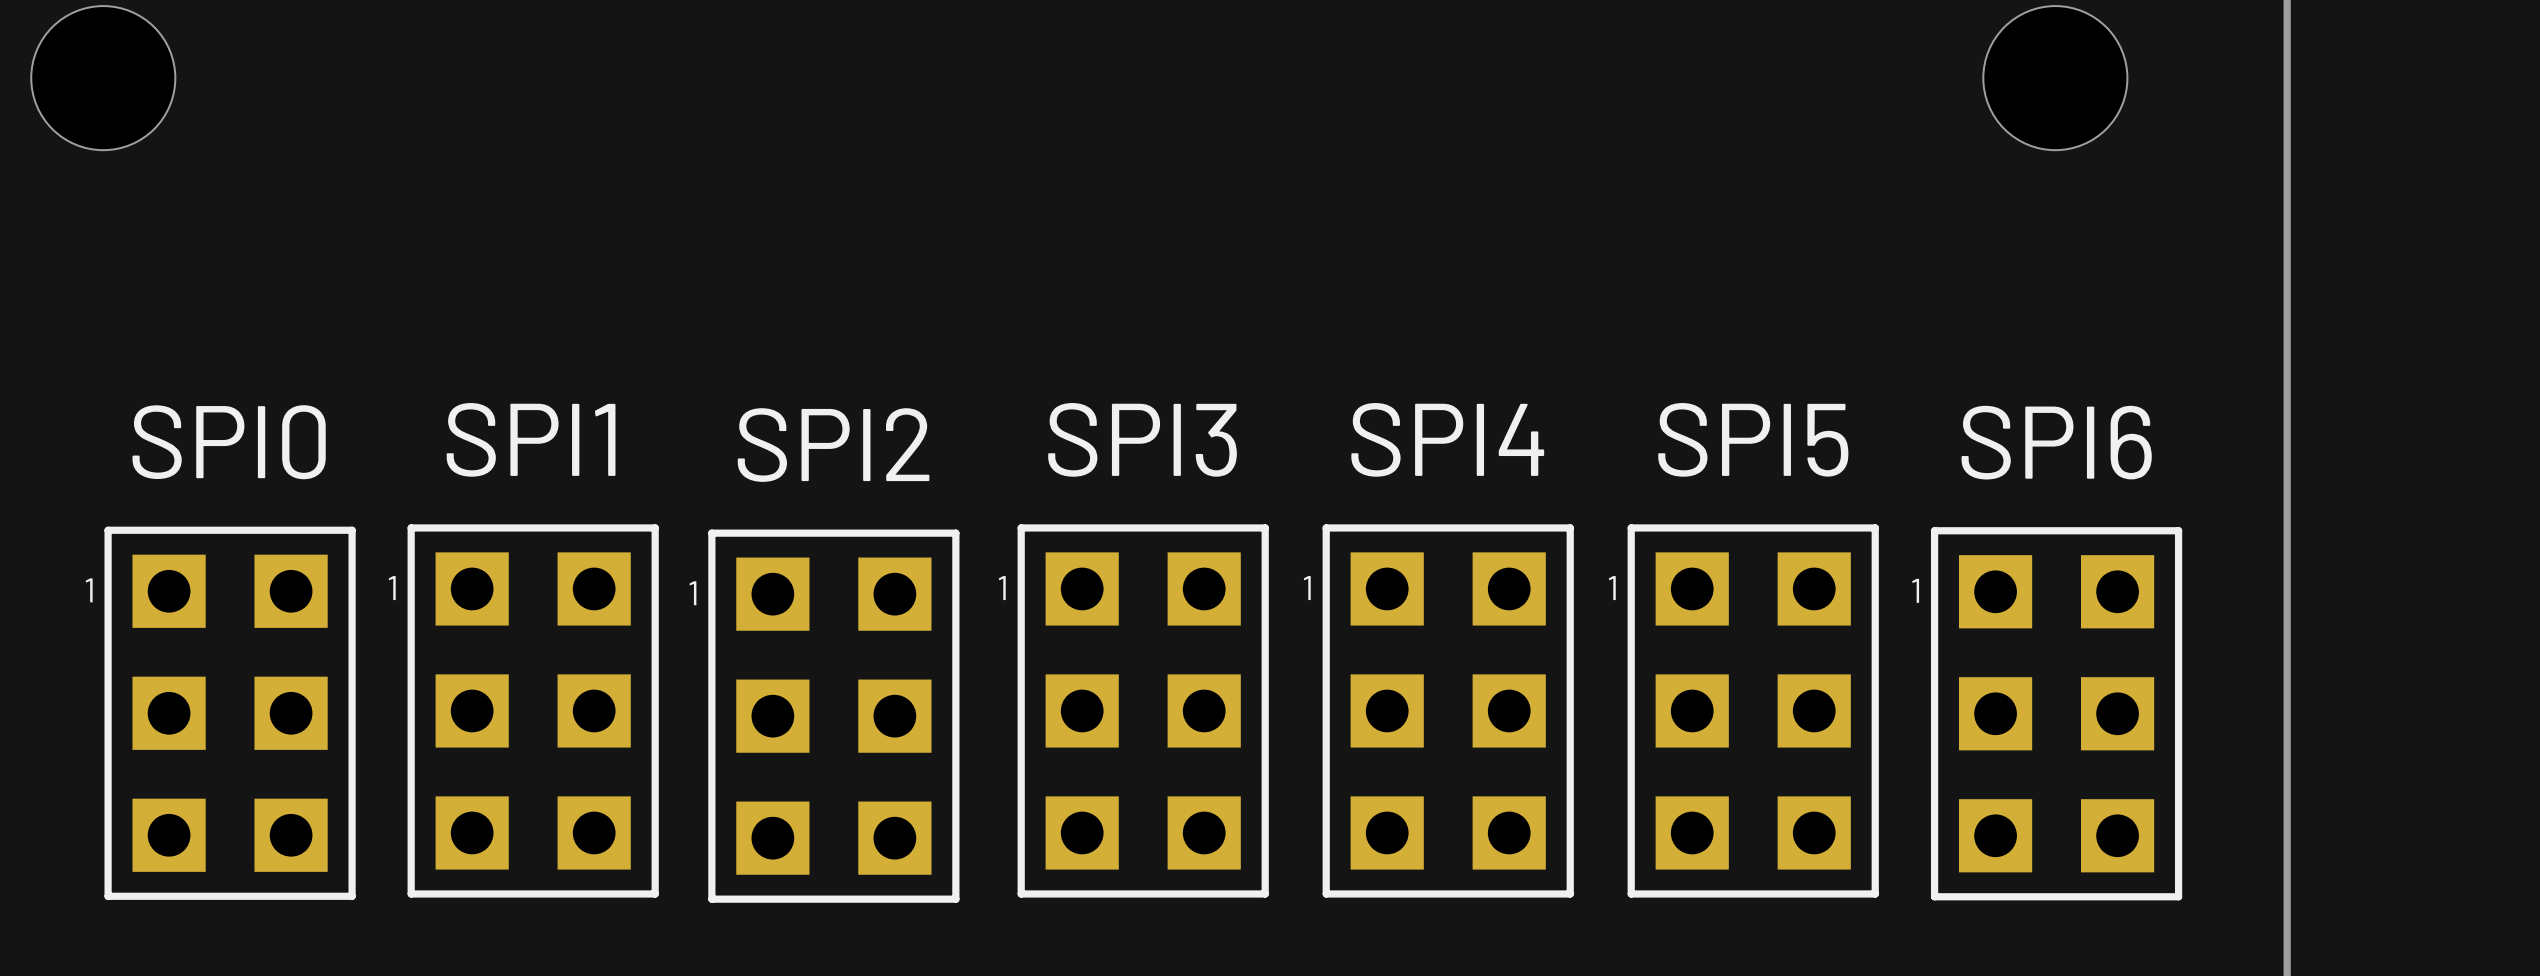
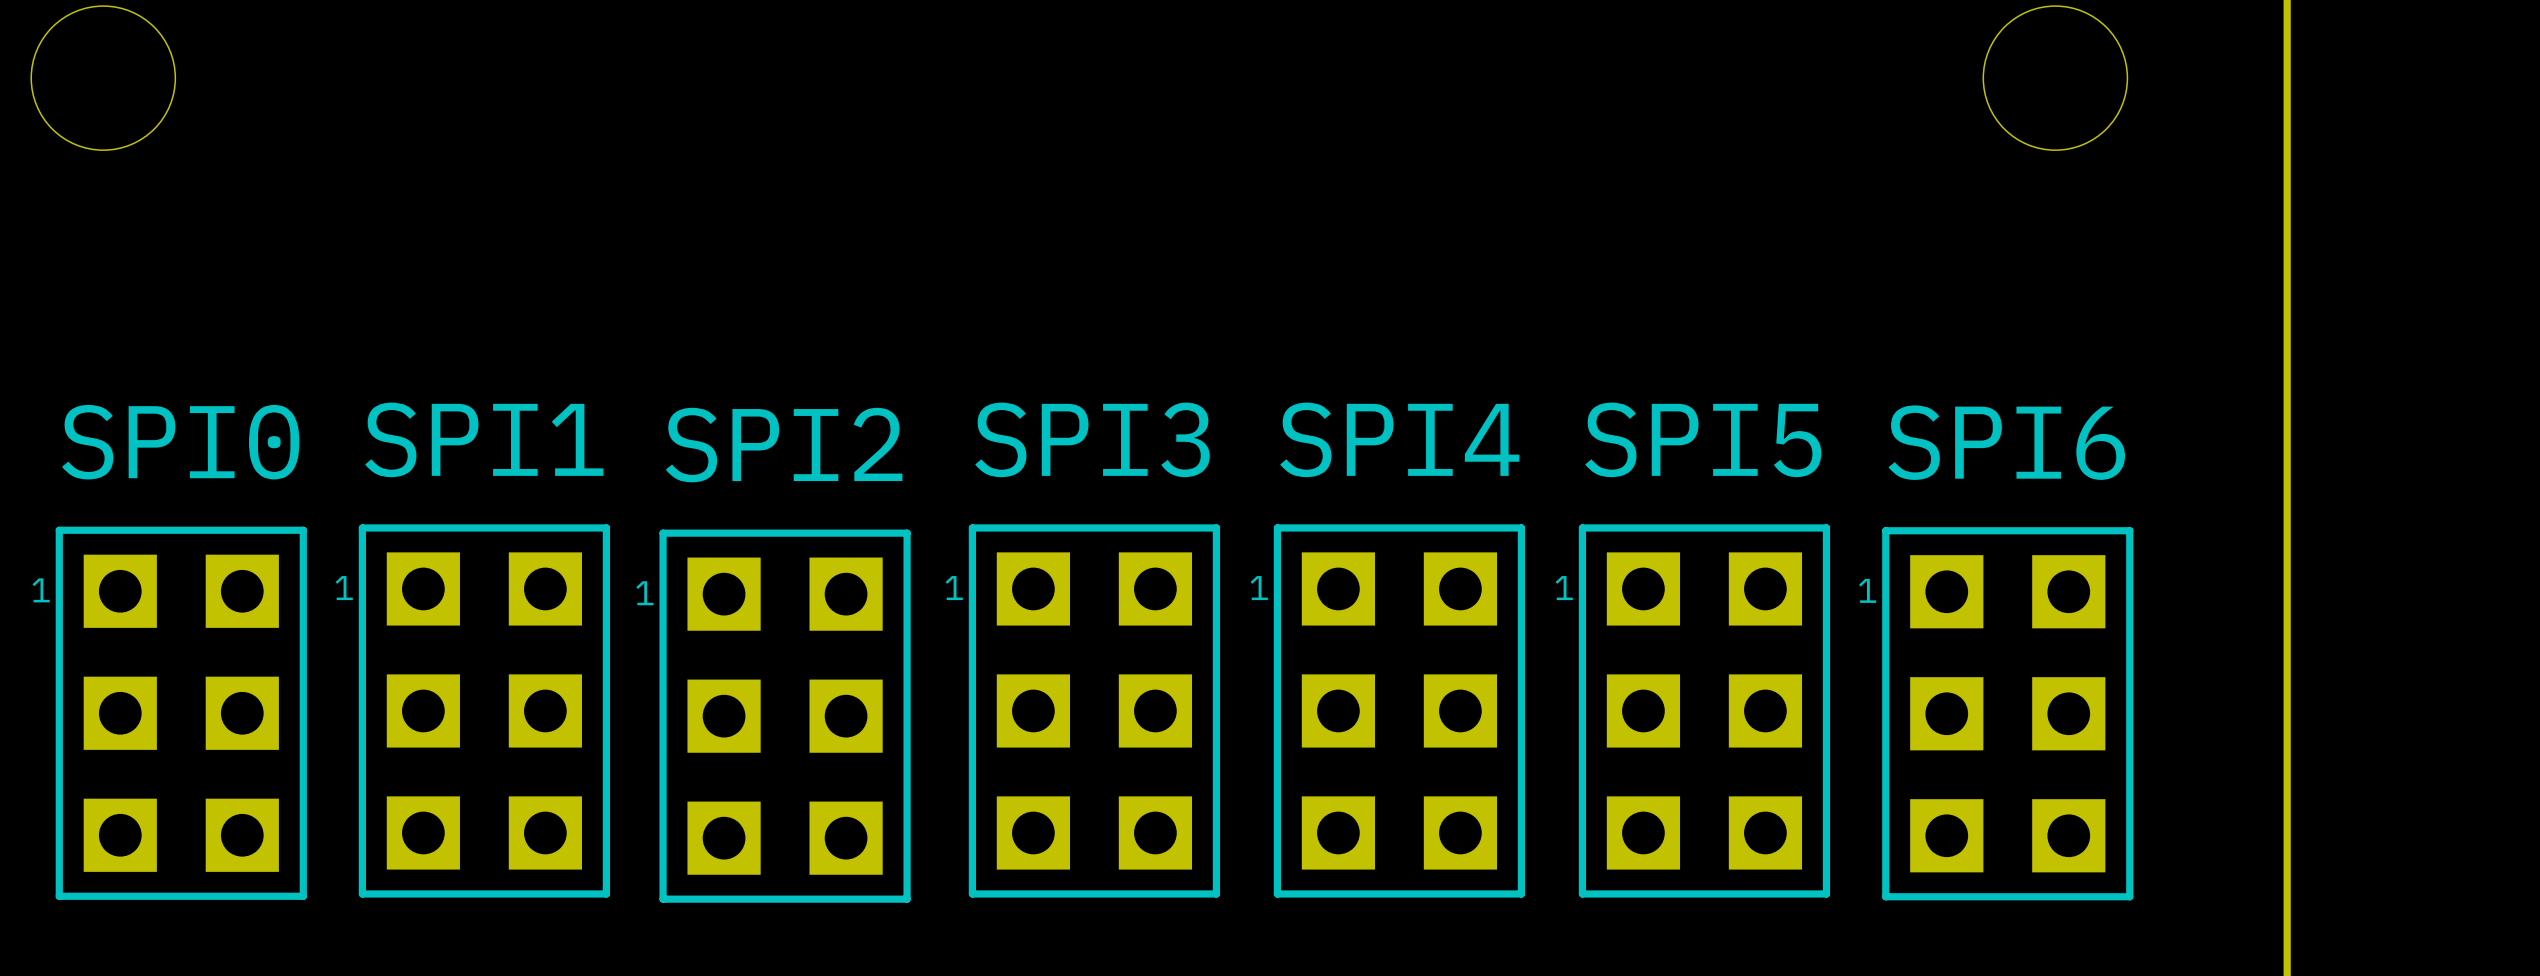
part position: (533, 710) -> (484, 710)
part position: (1143, 710) -> (1094, 710)
part position: (1448, 710) -> (1399, 710)
part position: (1753, 710) -> (1704, 710)
part position: (230, 713) -> (181, 713)
part position: (2056, 713) -> (2007, 713)
part position: (833, 716) -> (785, 716)

